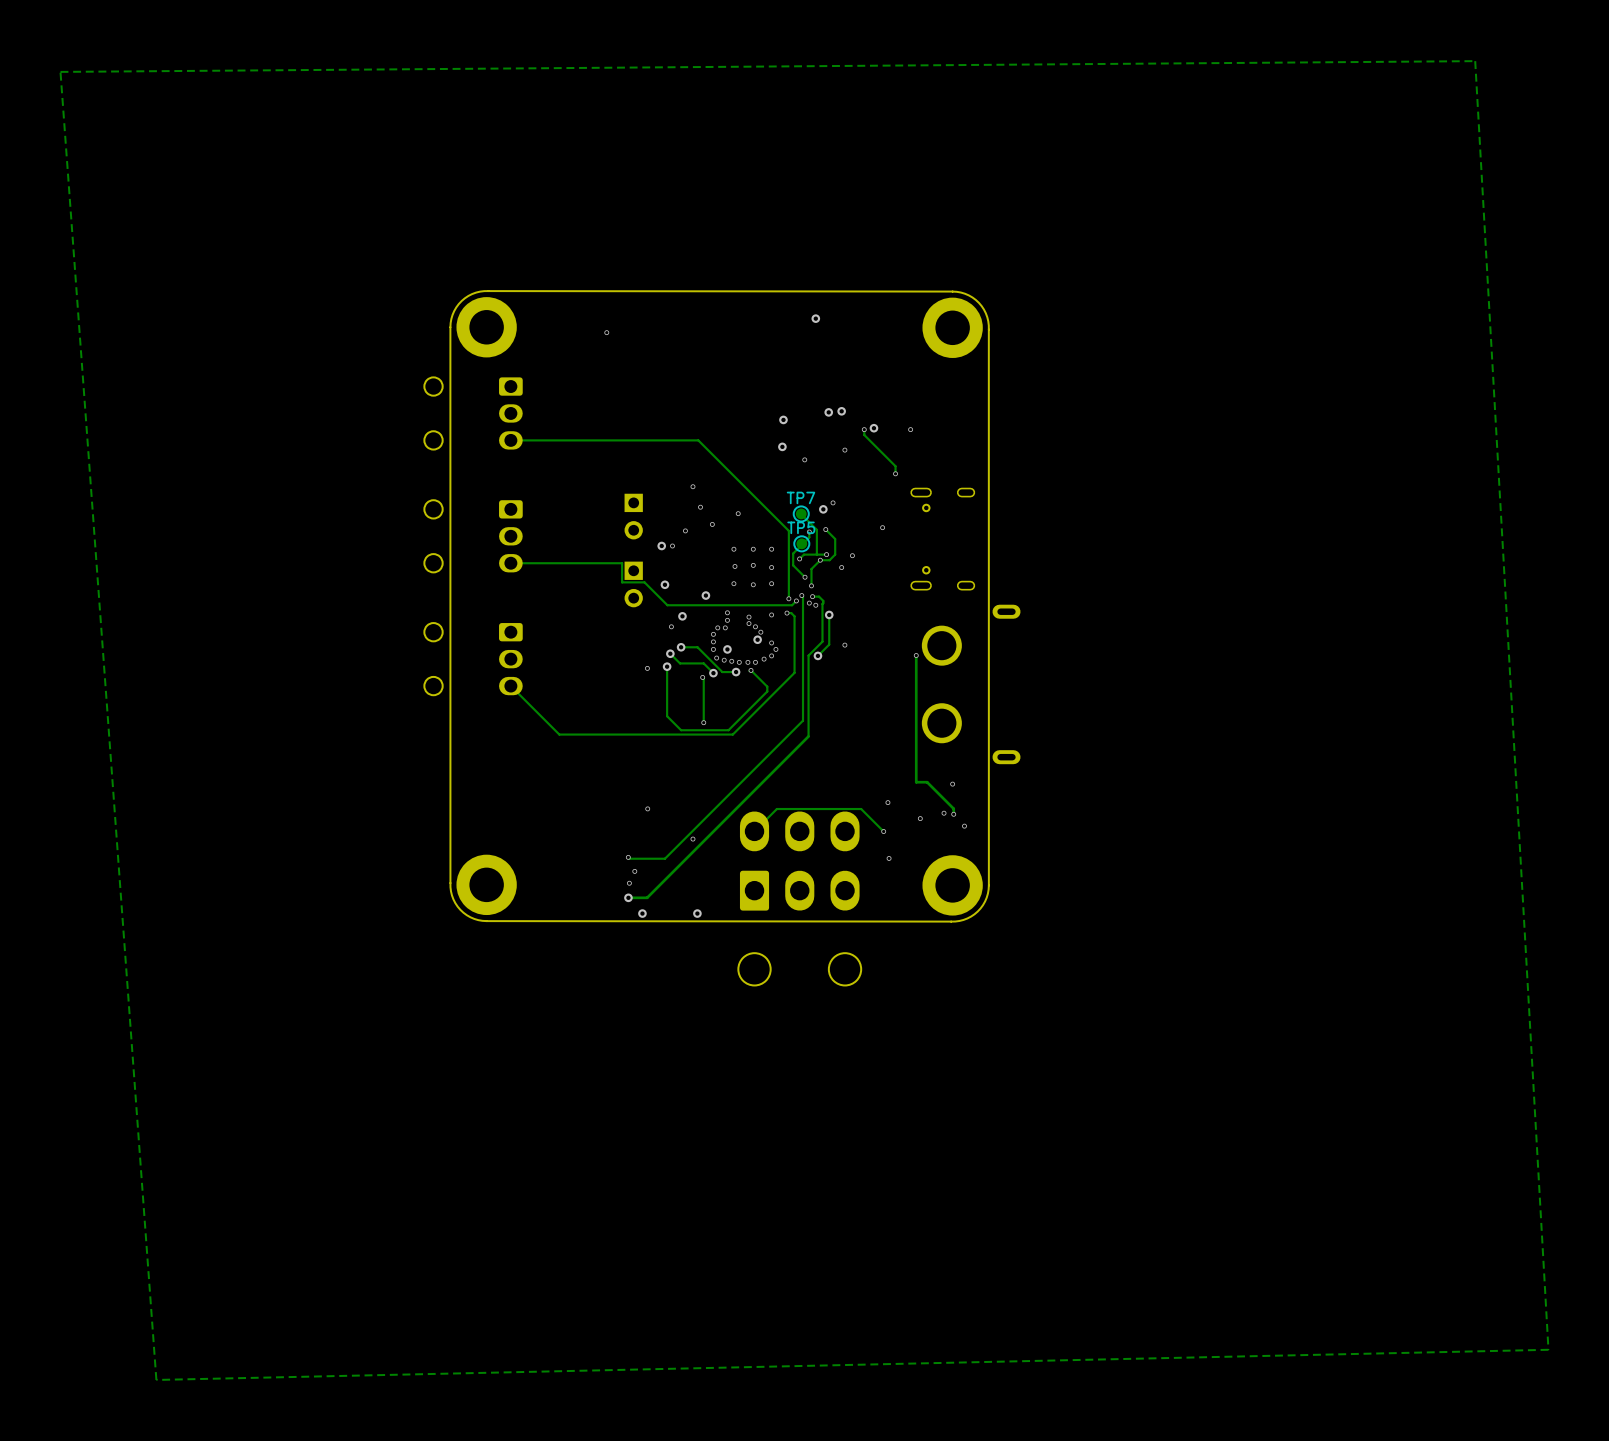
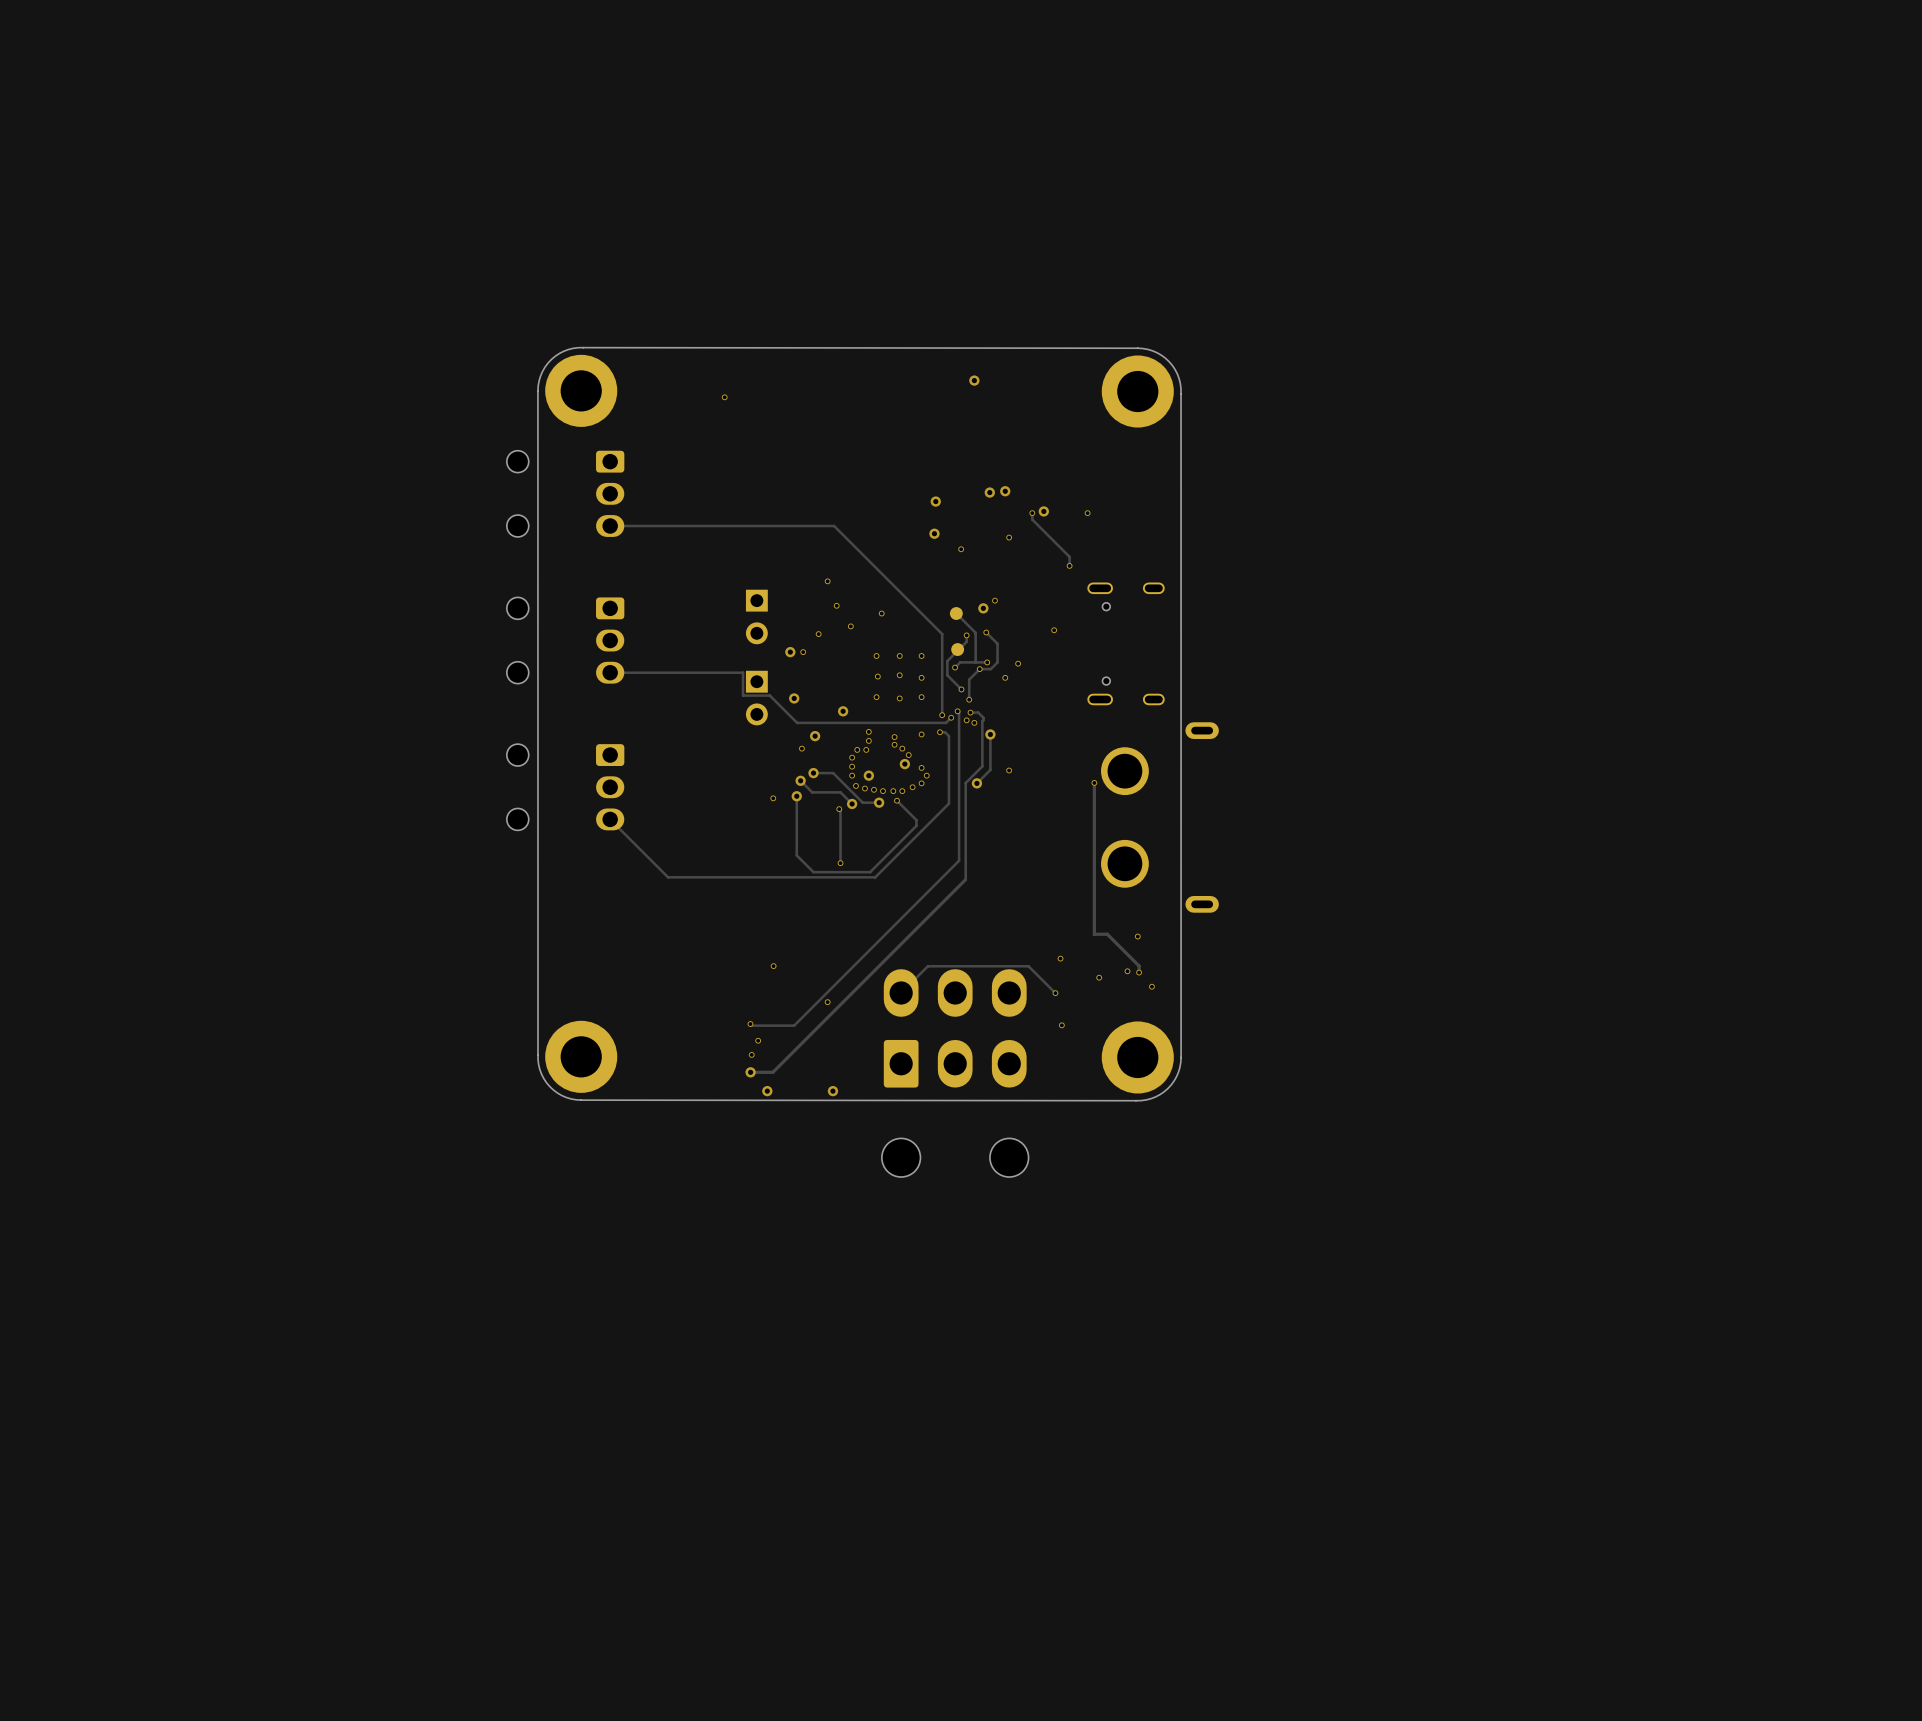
zone outline: (1475, 61) (1548, 1349) (156, 1379) (60, 71) (1475, 61) -> none
TP7 side: bottom (801, 513) -> top (956, 613)
TP5 side: bottom (801, 543) -> top (957, 649)

